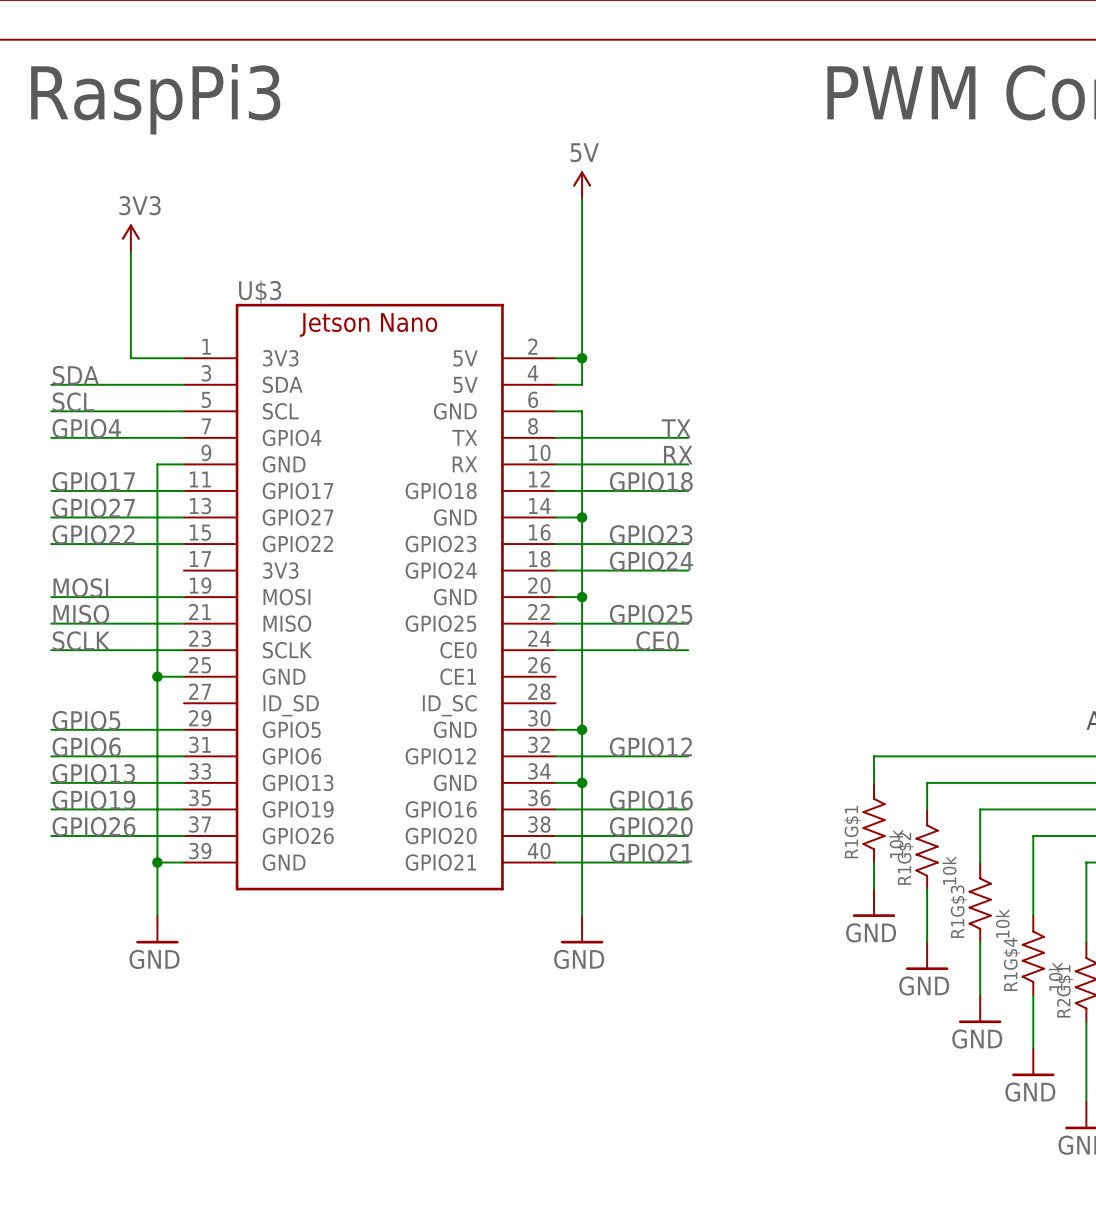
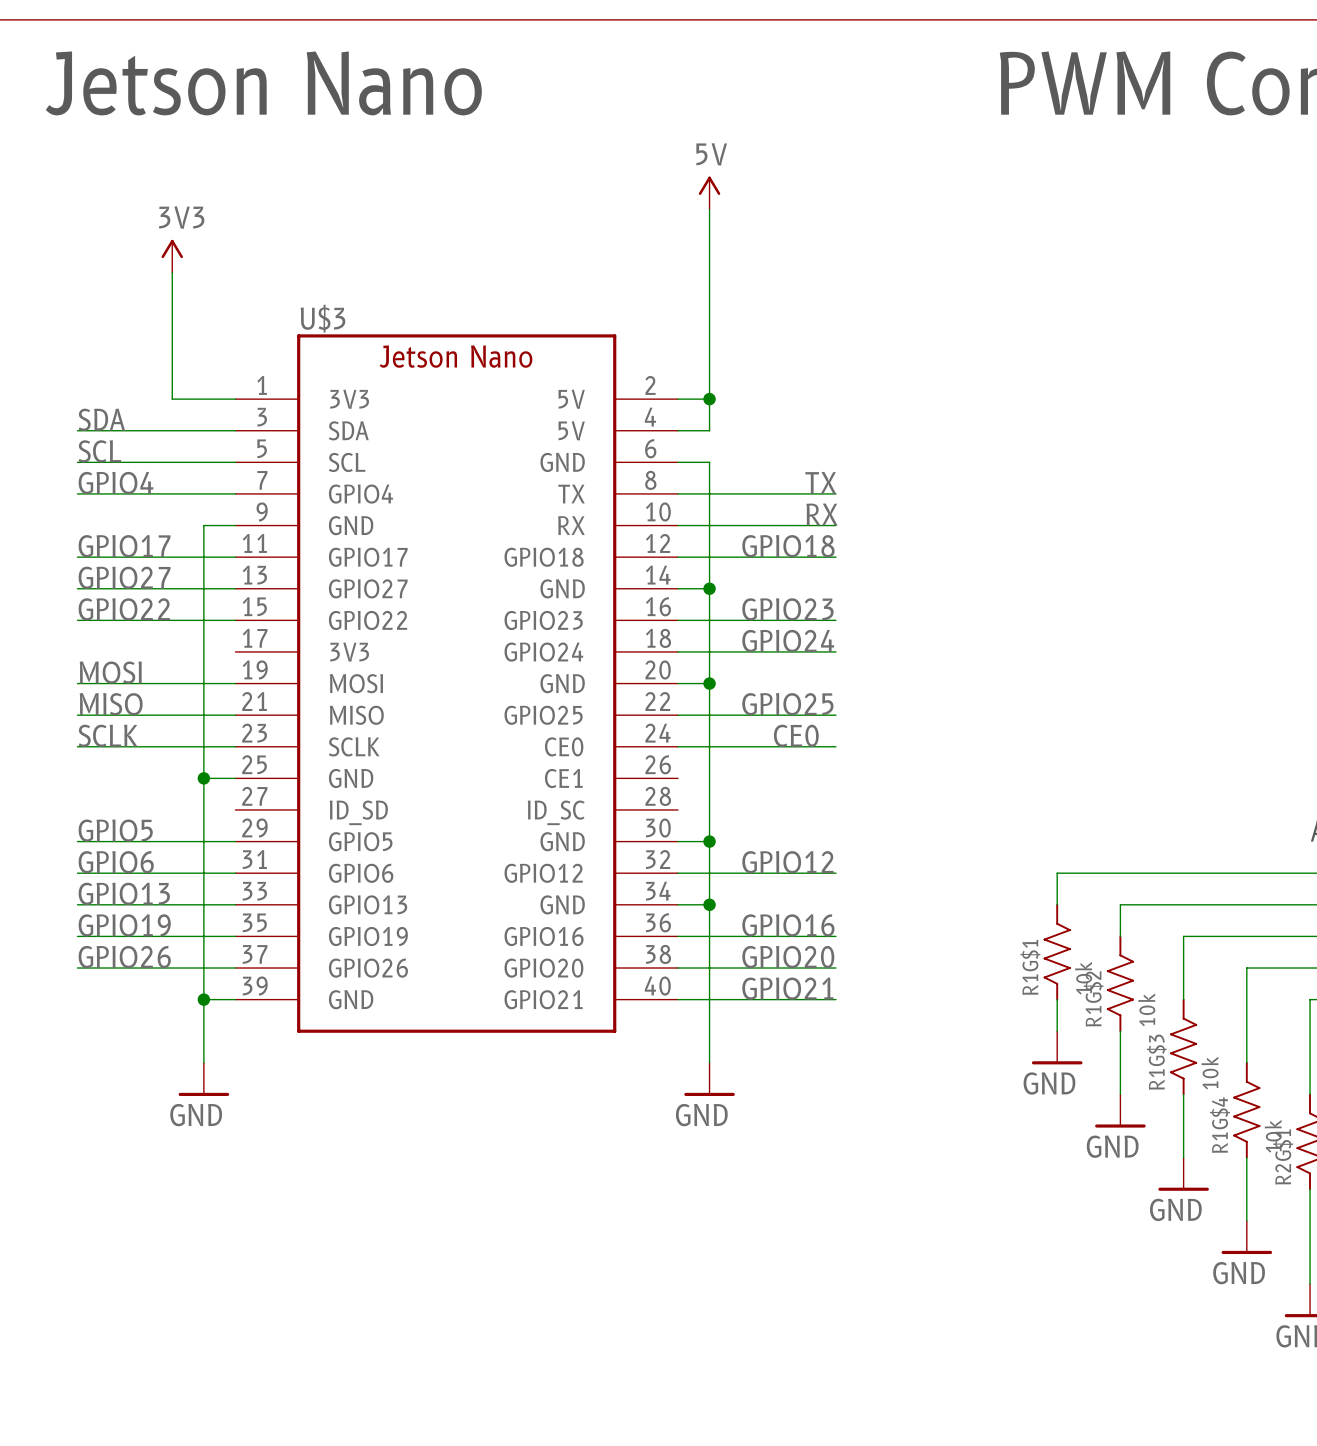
text: RaspPi3 (155, 99) -> Jetson Nano (263, 83)

